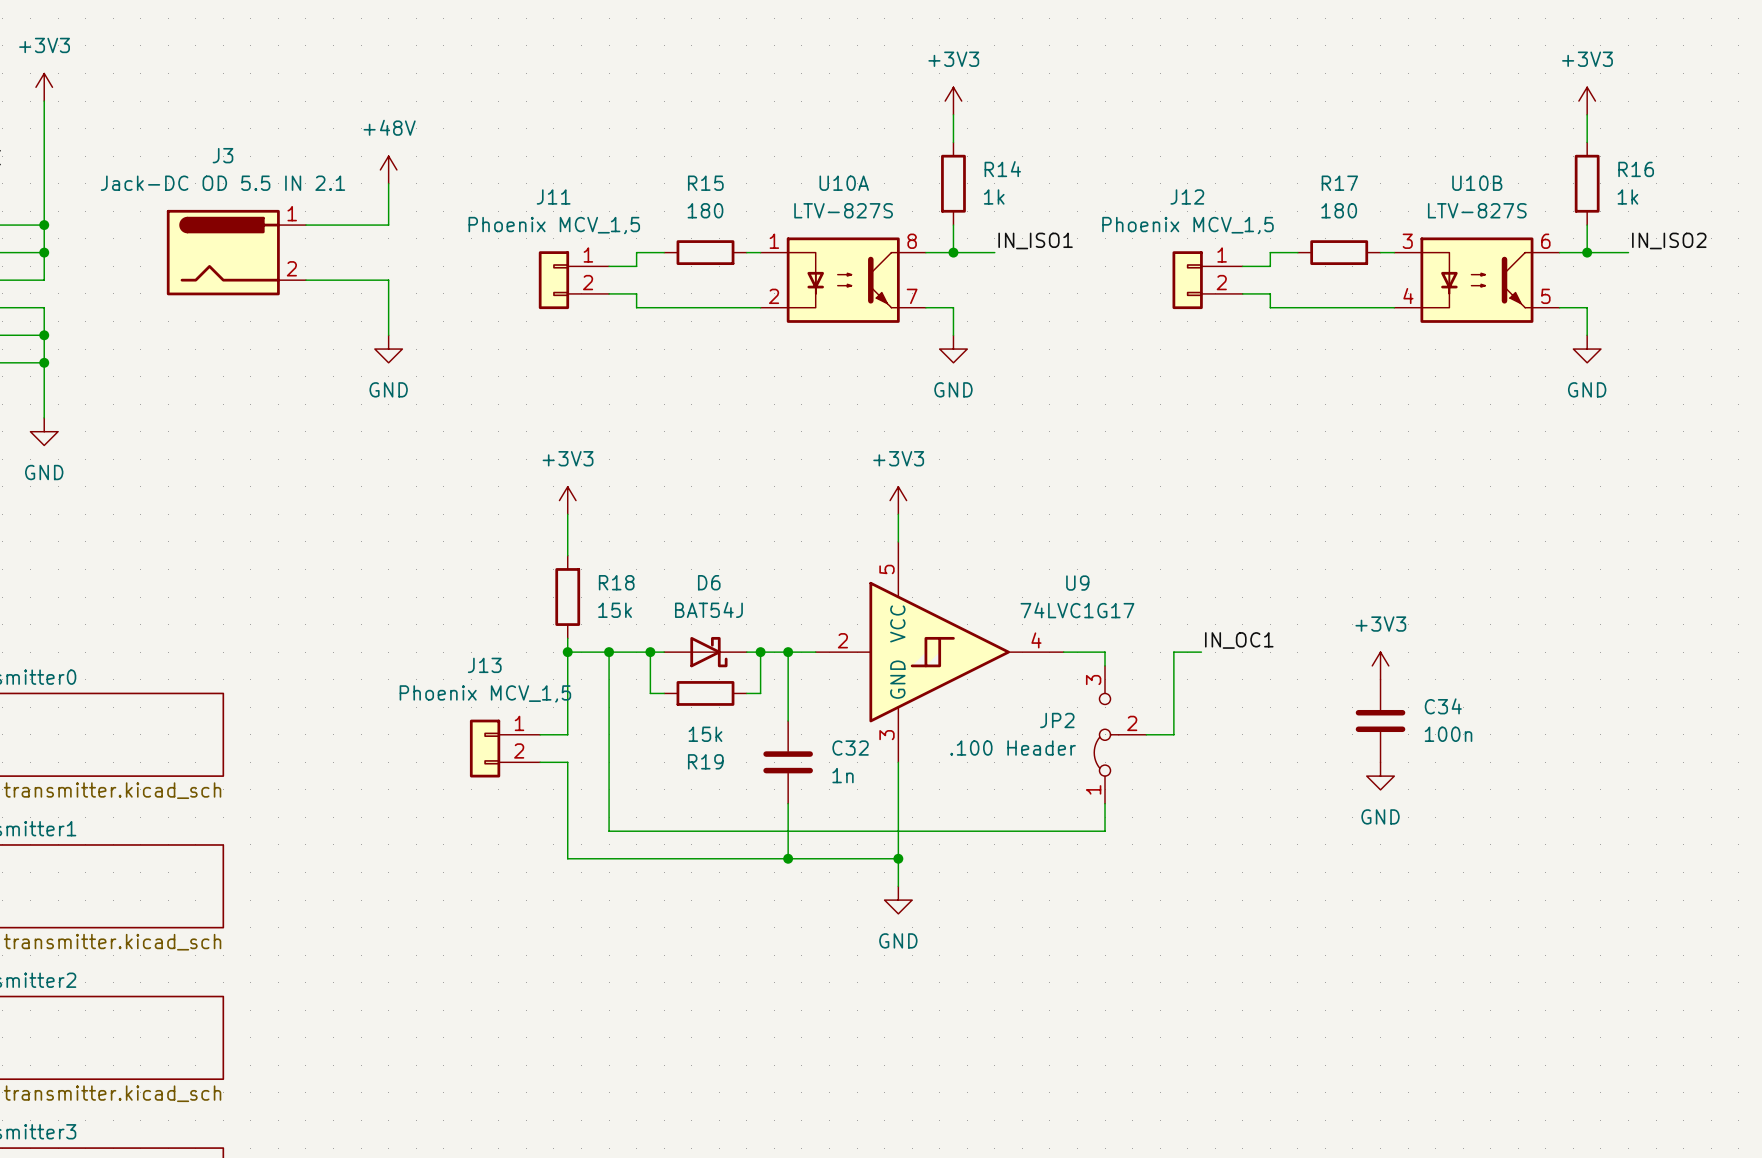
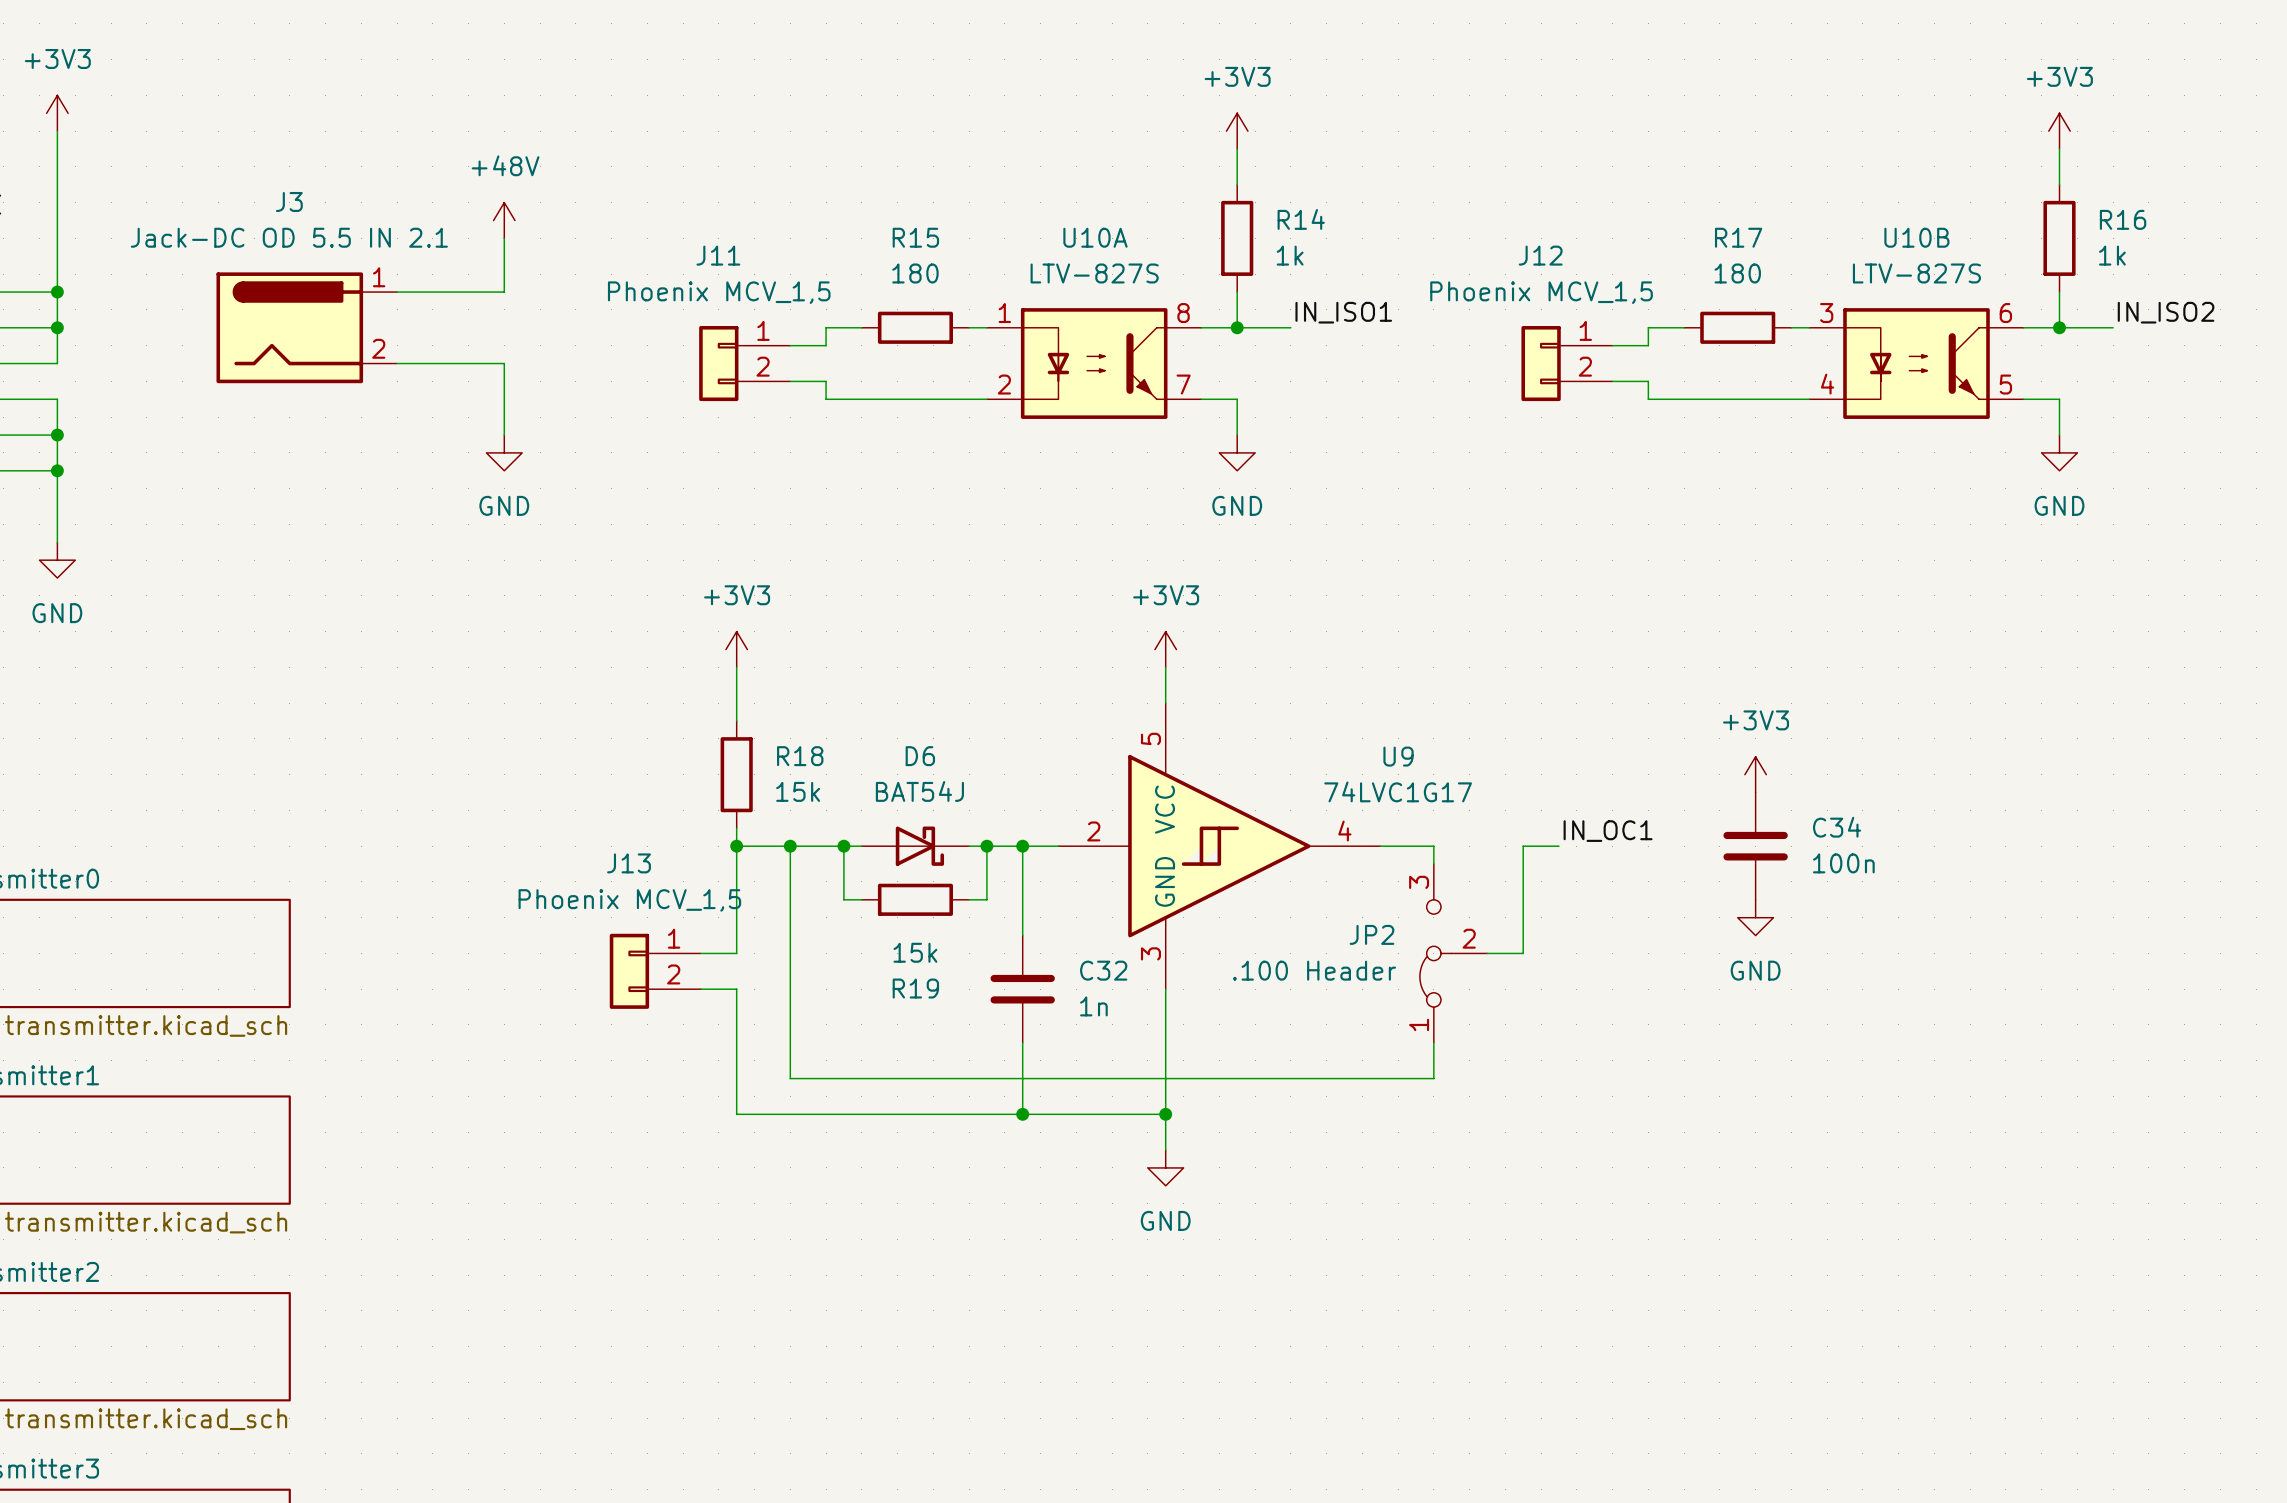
power symbol position: +3V3 (1380, 665) -> +3V3 (1755, 774)
C34 position: (1380, 721) -> (1755, 846)
power symbol position: GND (1380, 776) -> GND (1755, 917)

